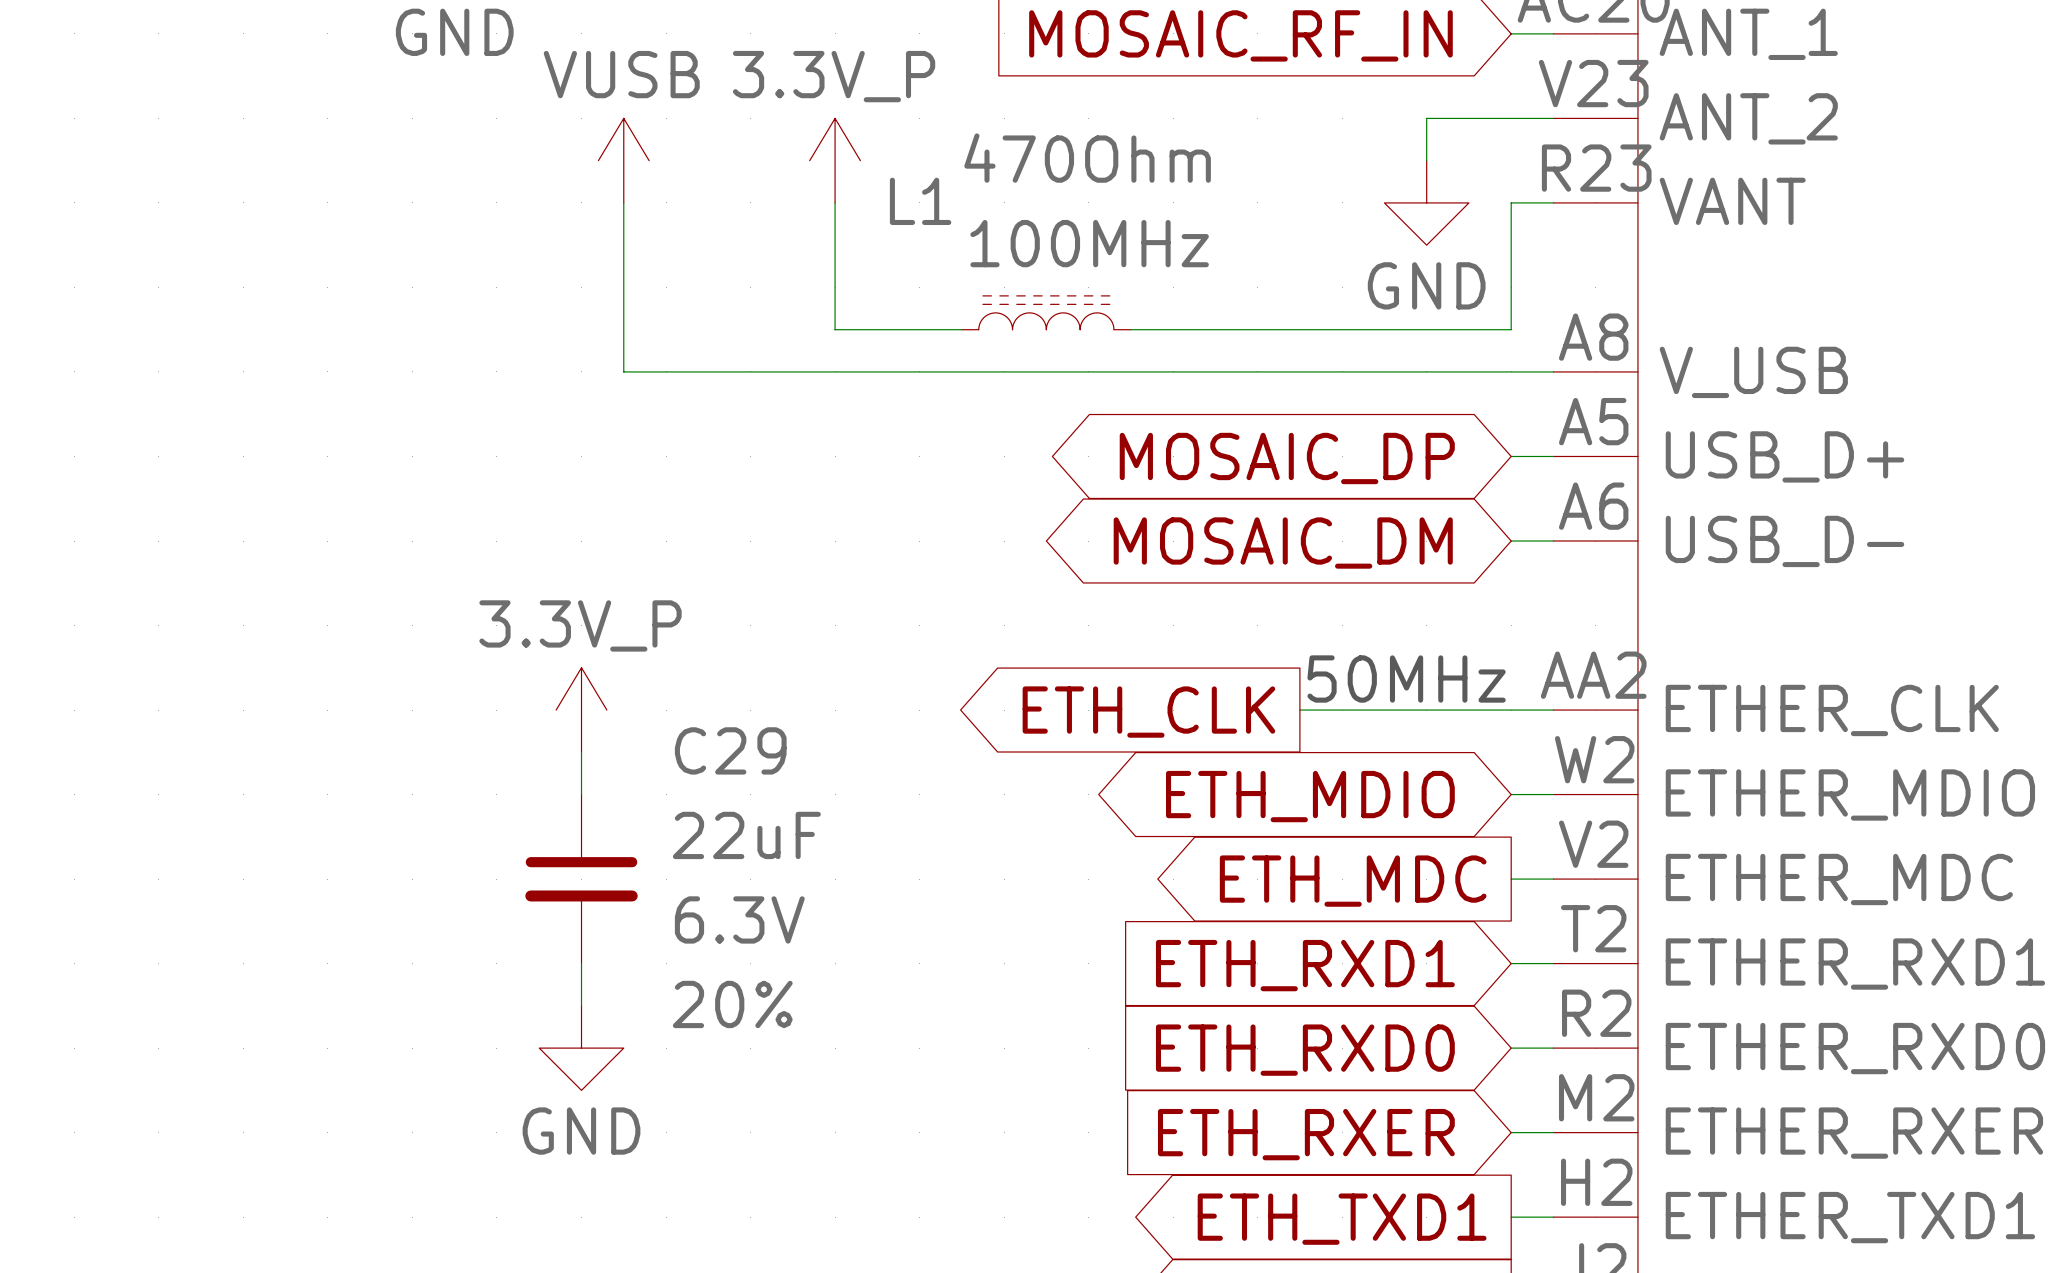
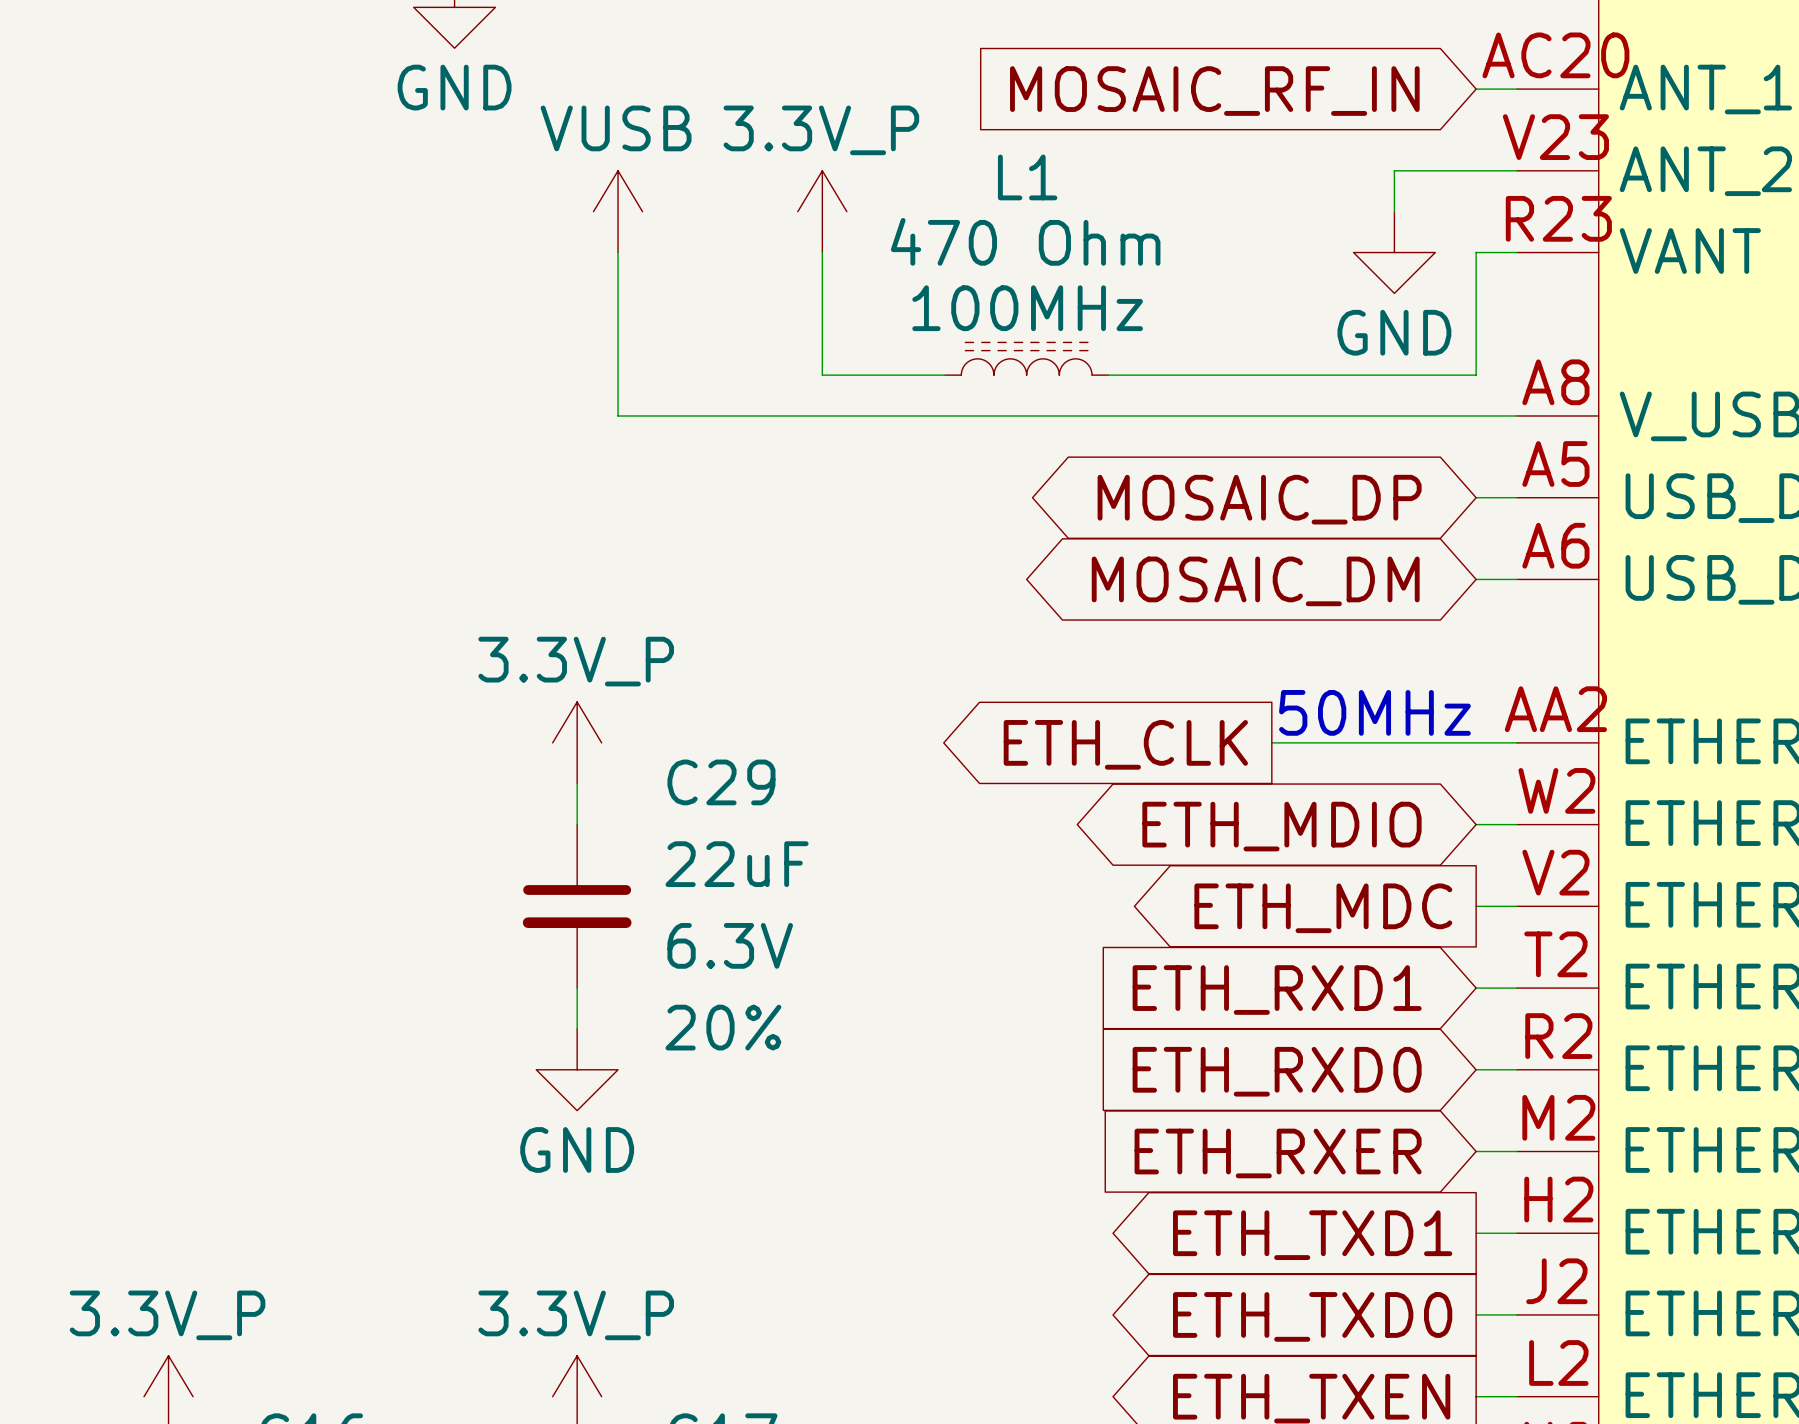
L1 value: 470Ohm (1087, 158) -> 470 Ohm (1025, 241)
L1 name position: L1 (920, 201) -> L1 (1027, 177)
L1 text position: 100MHz (1089, 243) -> 100MHz (1027, 308)

